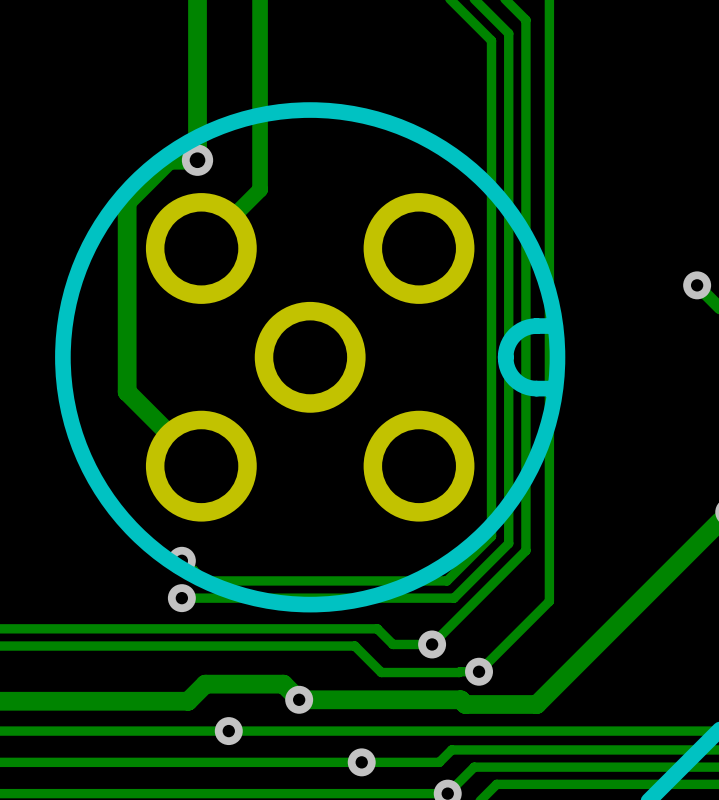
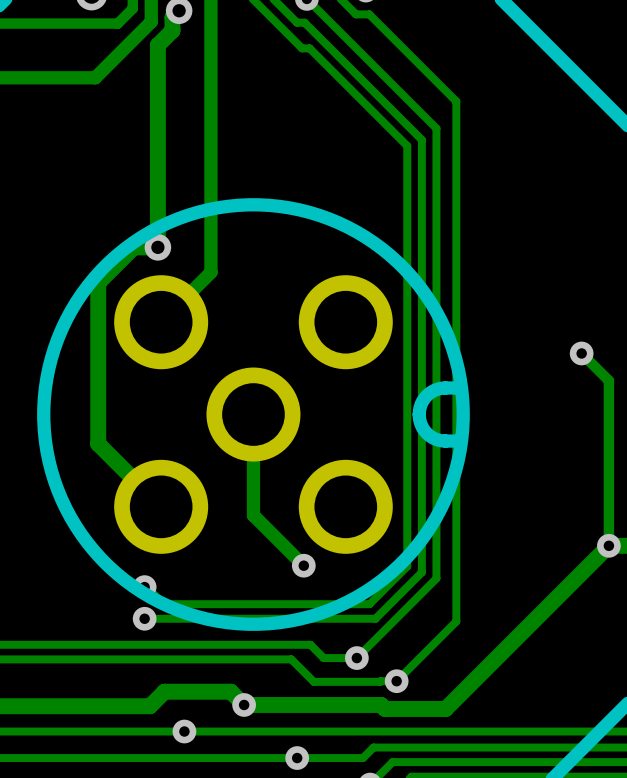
track: none -> (253, 414) (253, 515) (303, 565)
via: none -> (303, 565)

